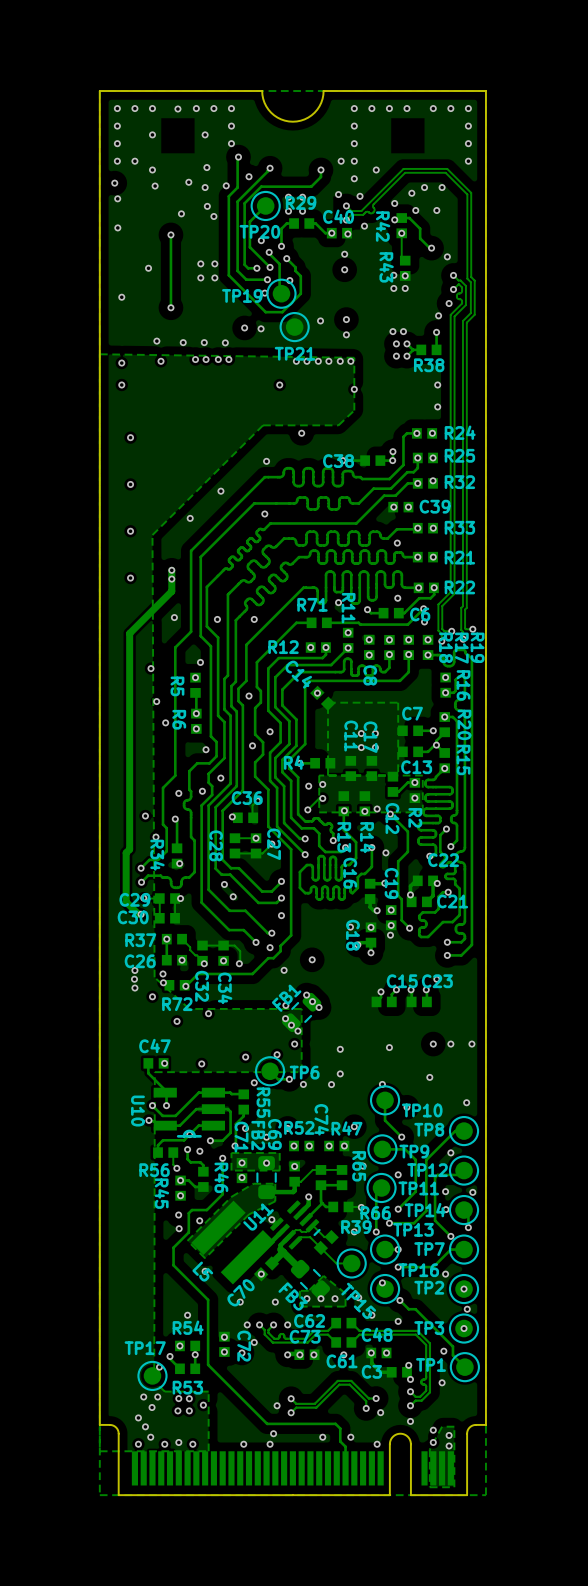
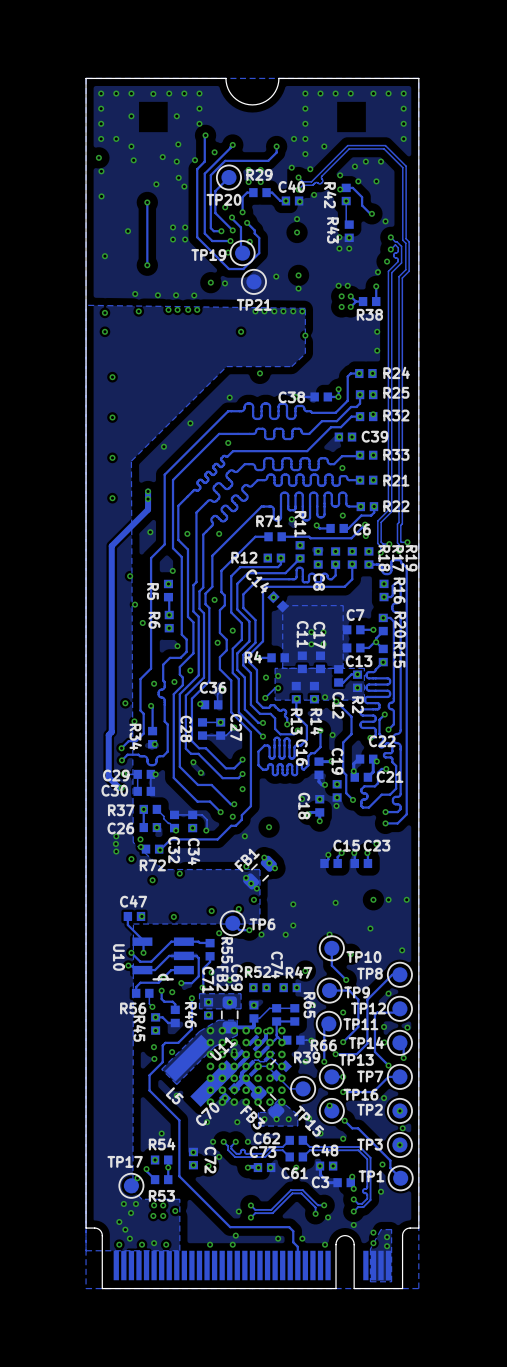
part: none -> (246, 1066)

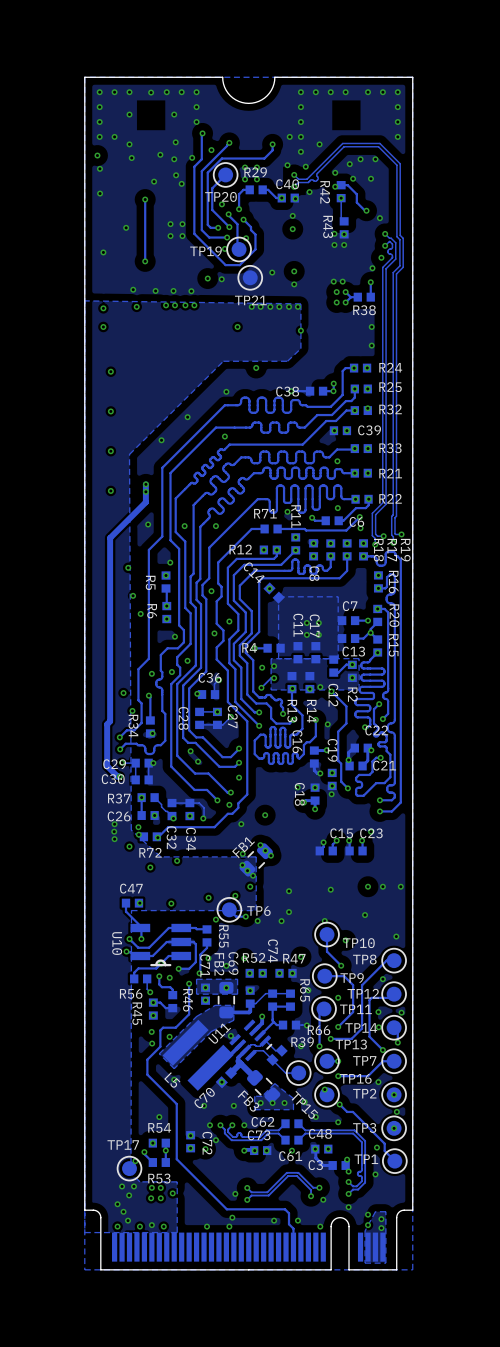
part: (246, 1066) -> none

